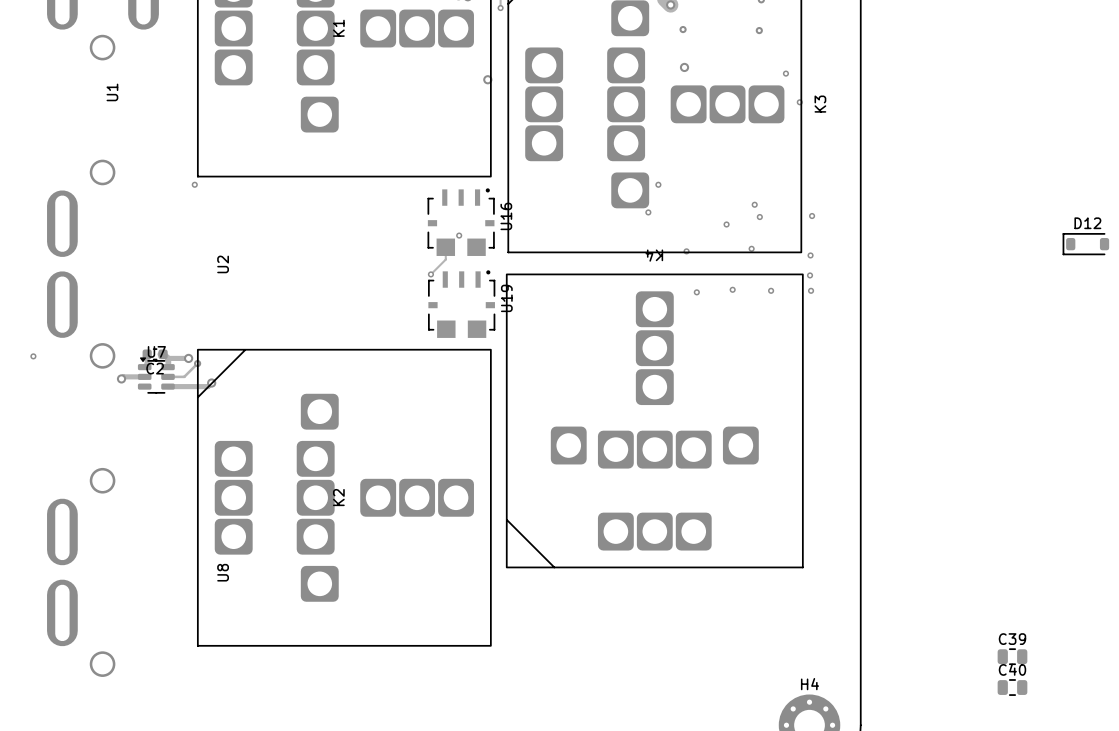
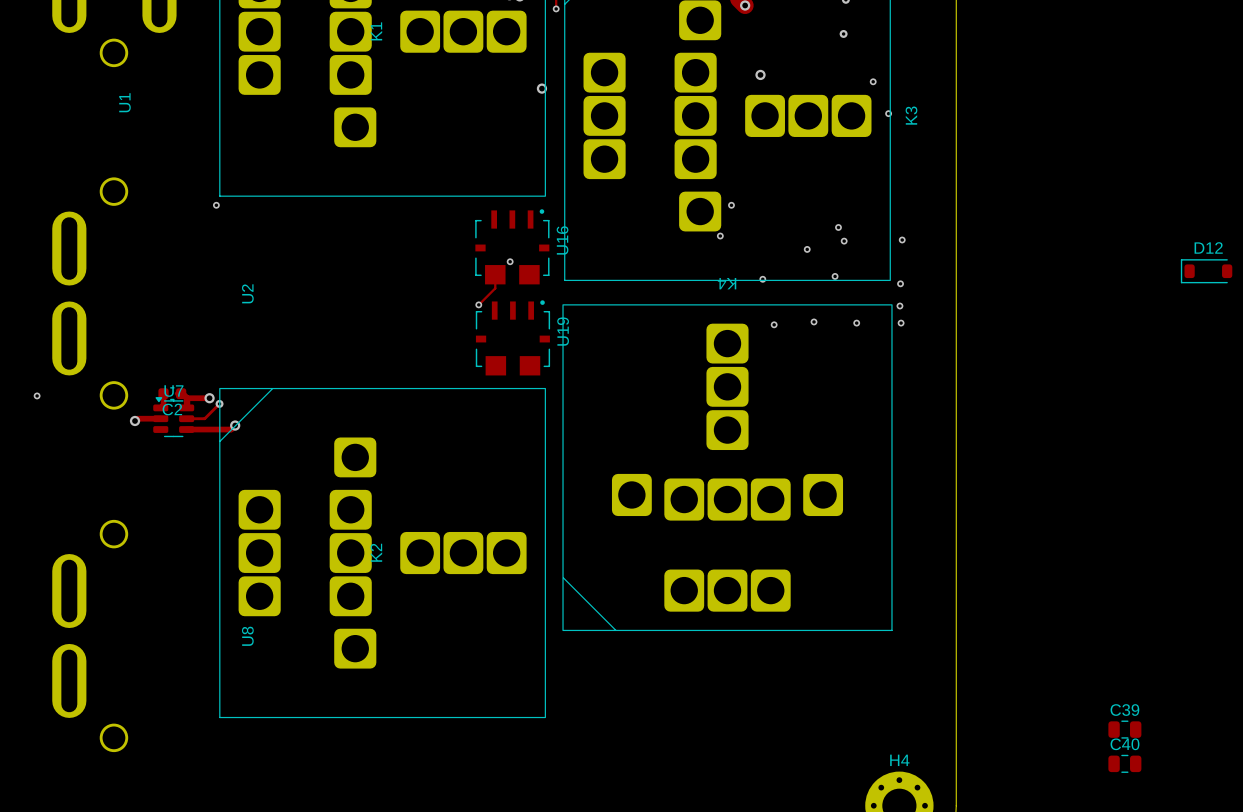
via: (683, 29) -> none

